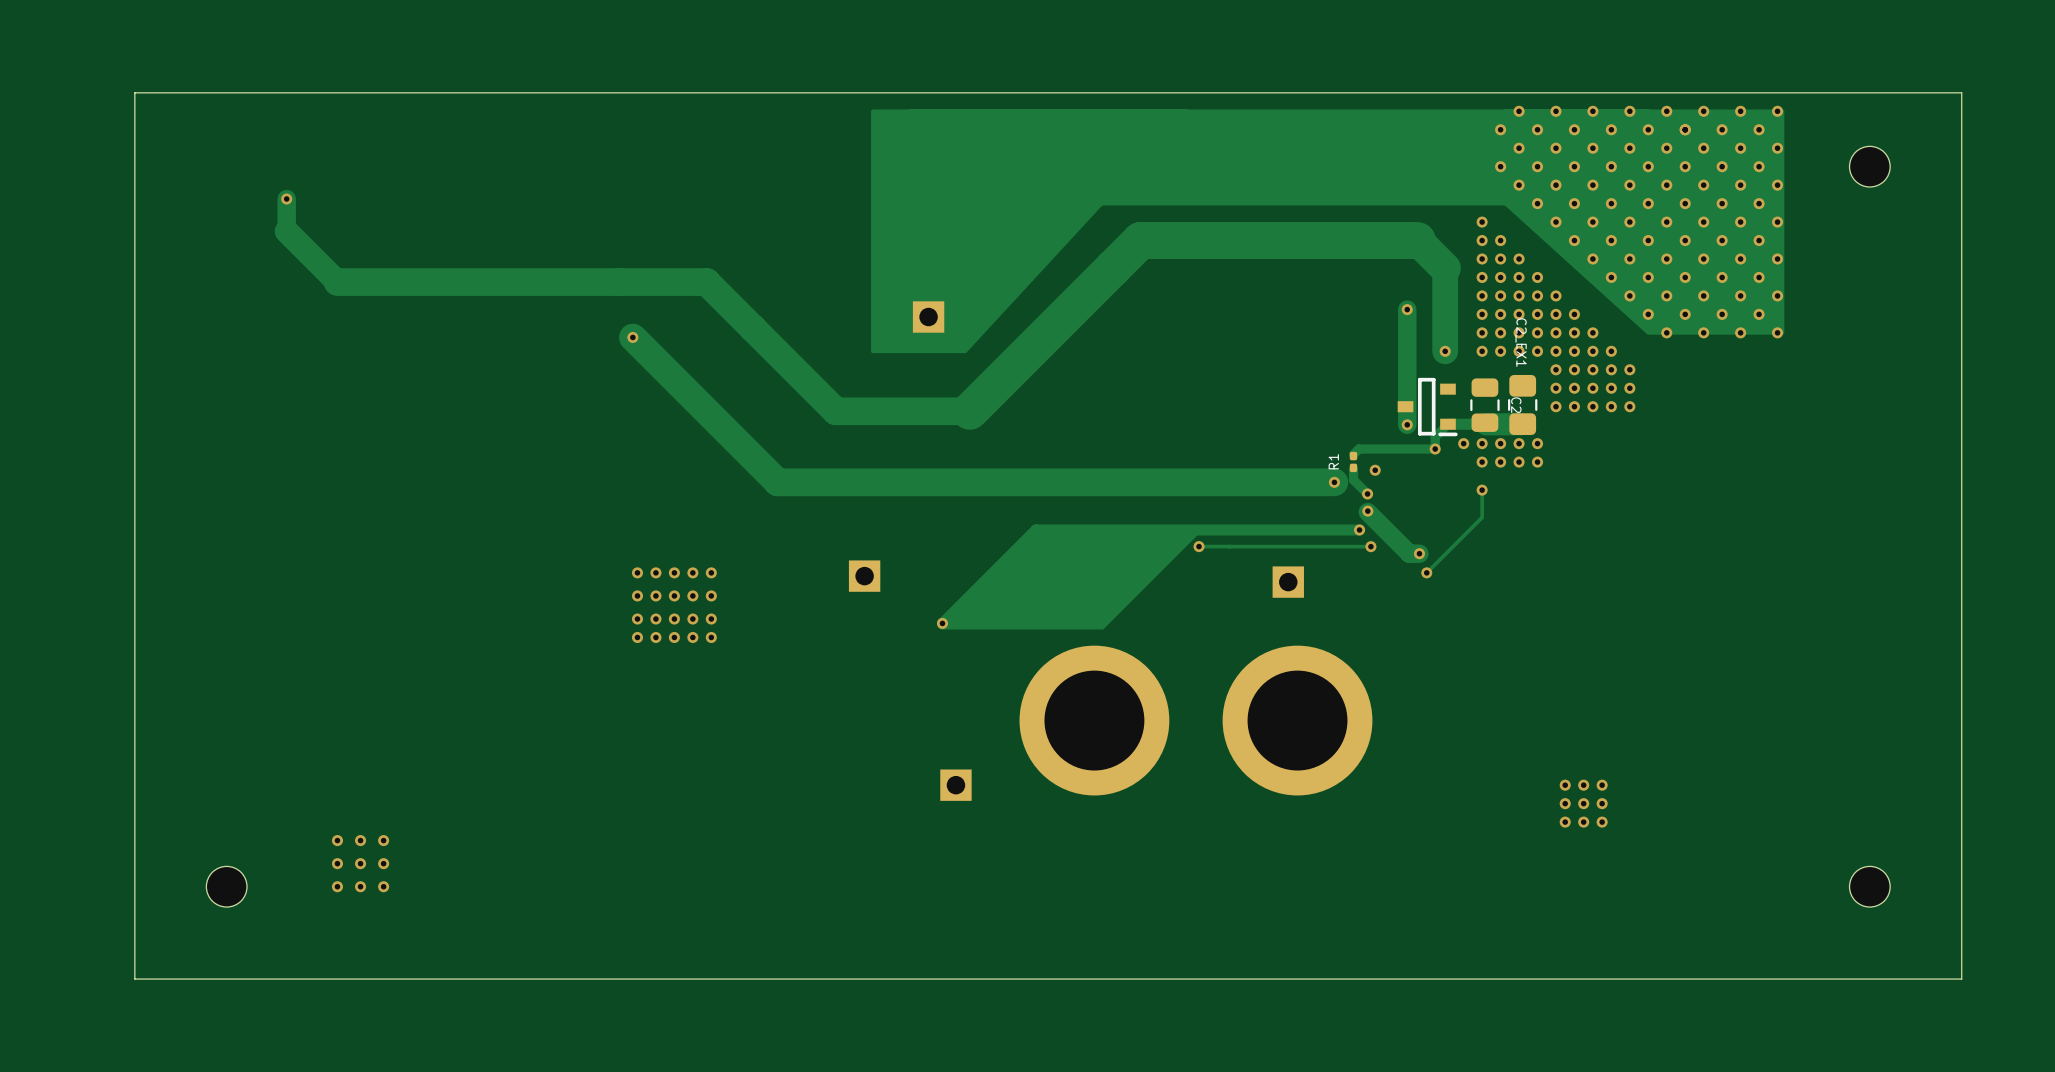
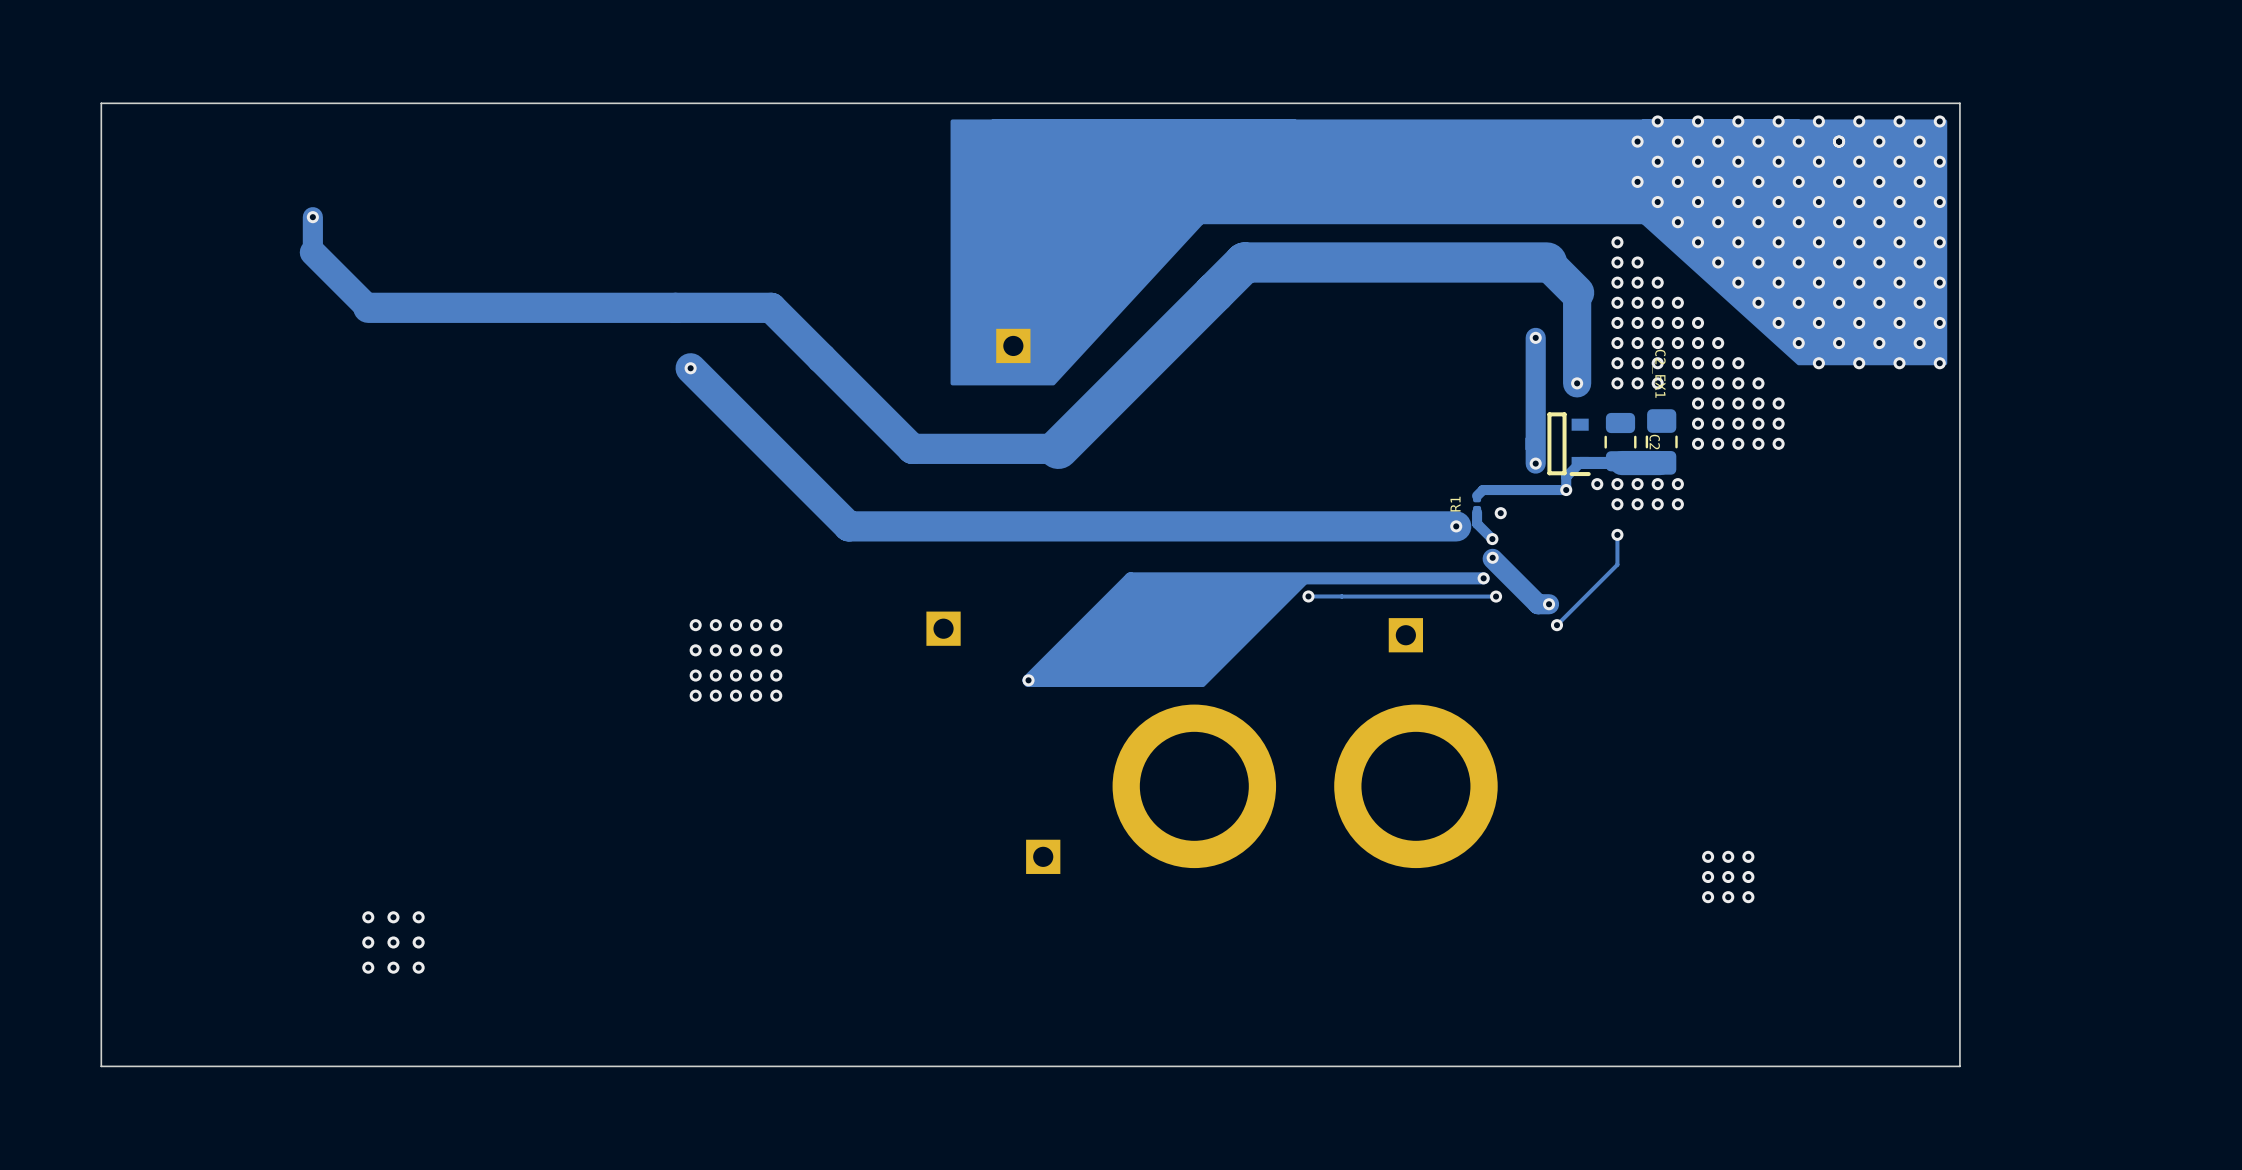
board edge: (1961, 92) (134, 92) (134, 979) (1961, 979) (1961, 92) -> (1959, 103) (1959, 1066) (101, 1066) (101, 103) (1959, 103)
part: (1869, 166) -> none
part: (226, 886) -> none
part: (1869, 886) -> none

